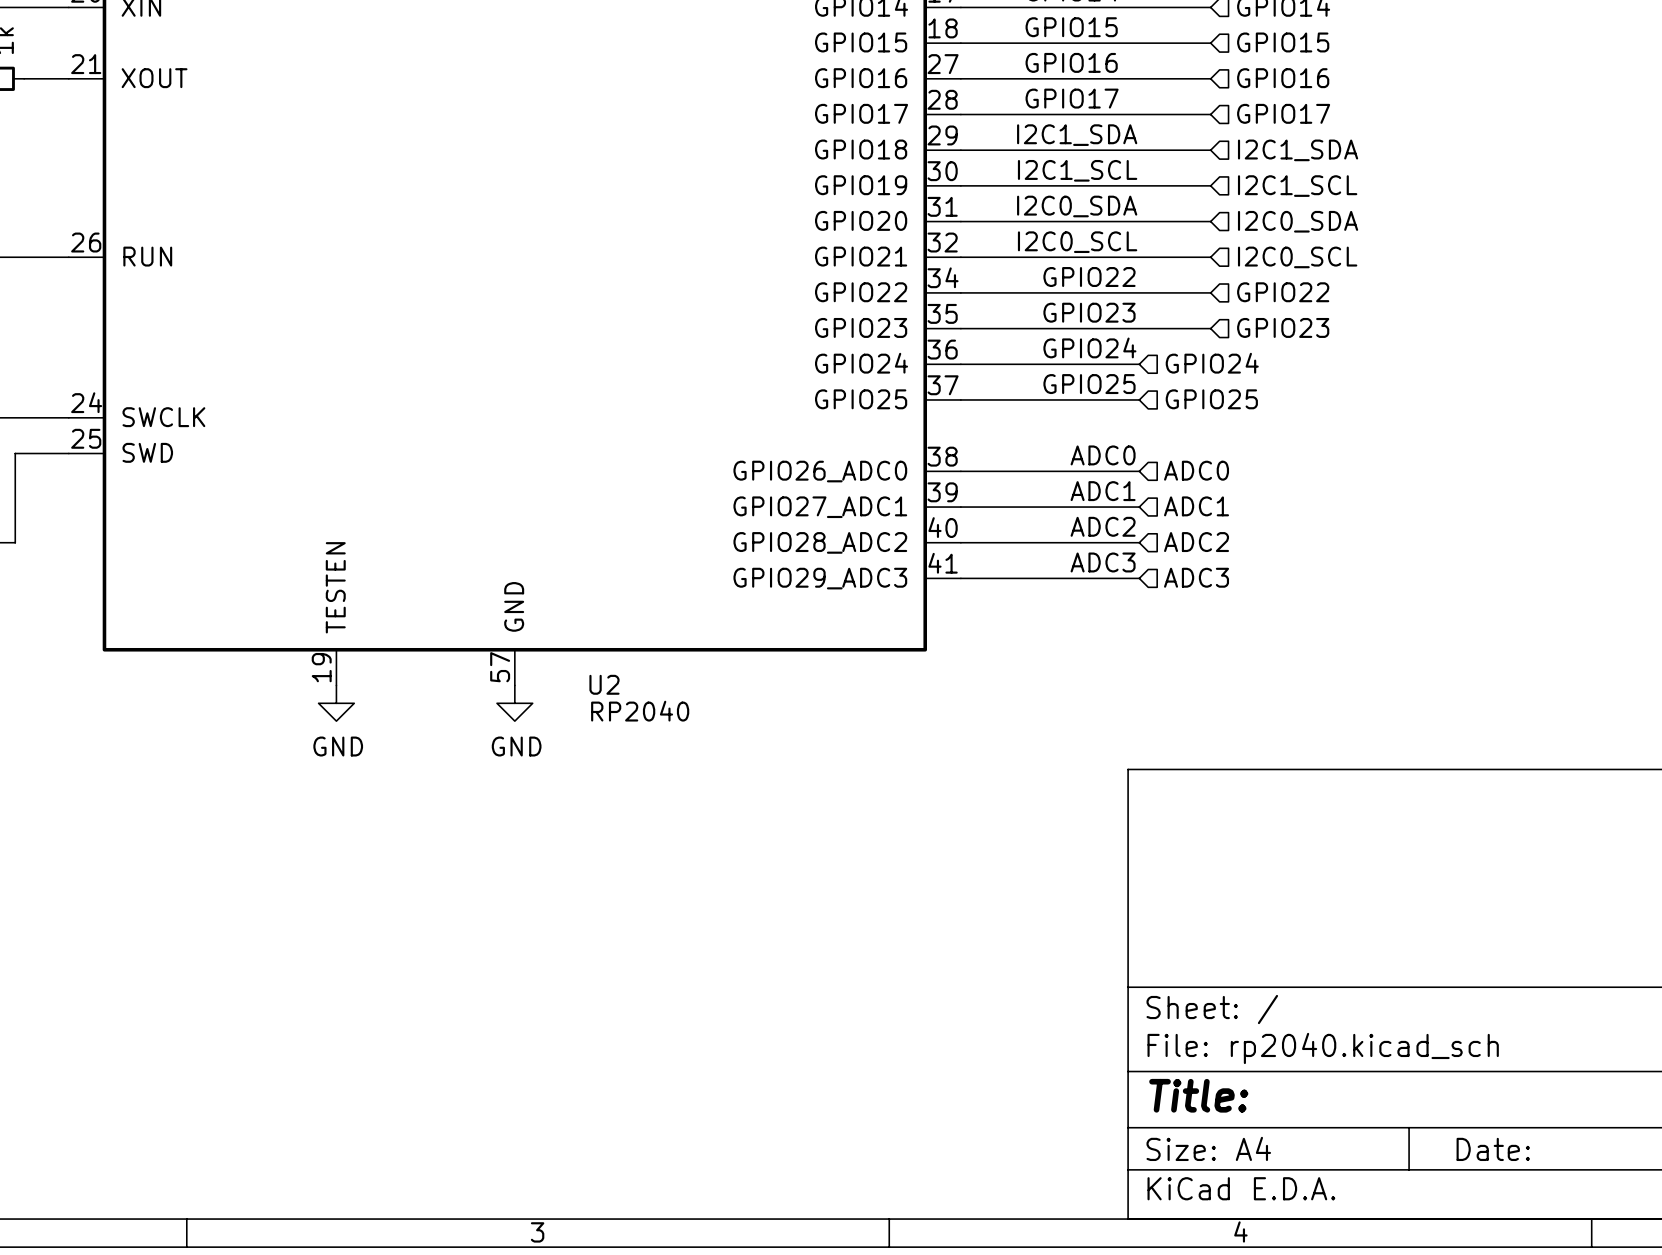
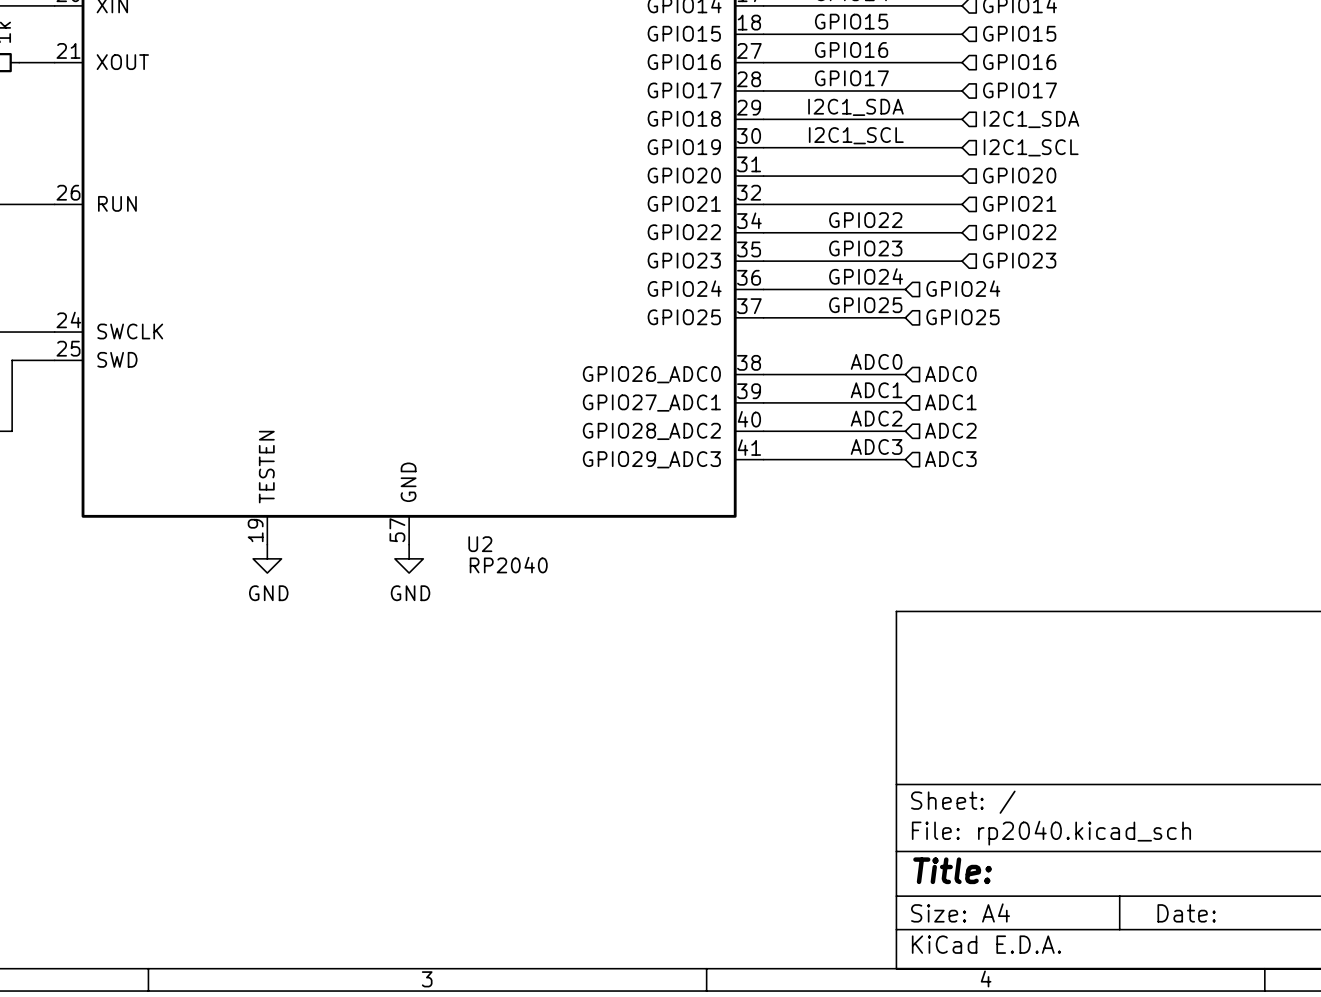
label: I2C0_SDA (1077, 206) -> none
hierarchical label: I2C0_SDA (1298, 221) -> GPIO20 (1019, 175)
label: I2C0_SCL (1077, 242) -> none
hierarchical label: I2C0_SCL (1297, 257) -> GPIO21 (1019, 203)

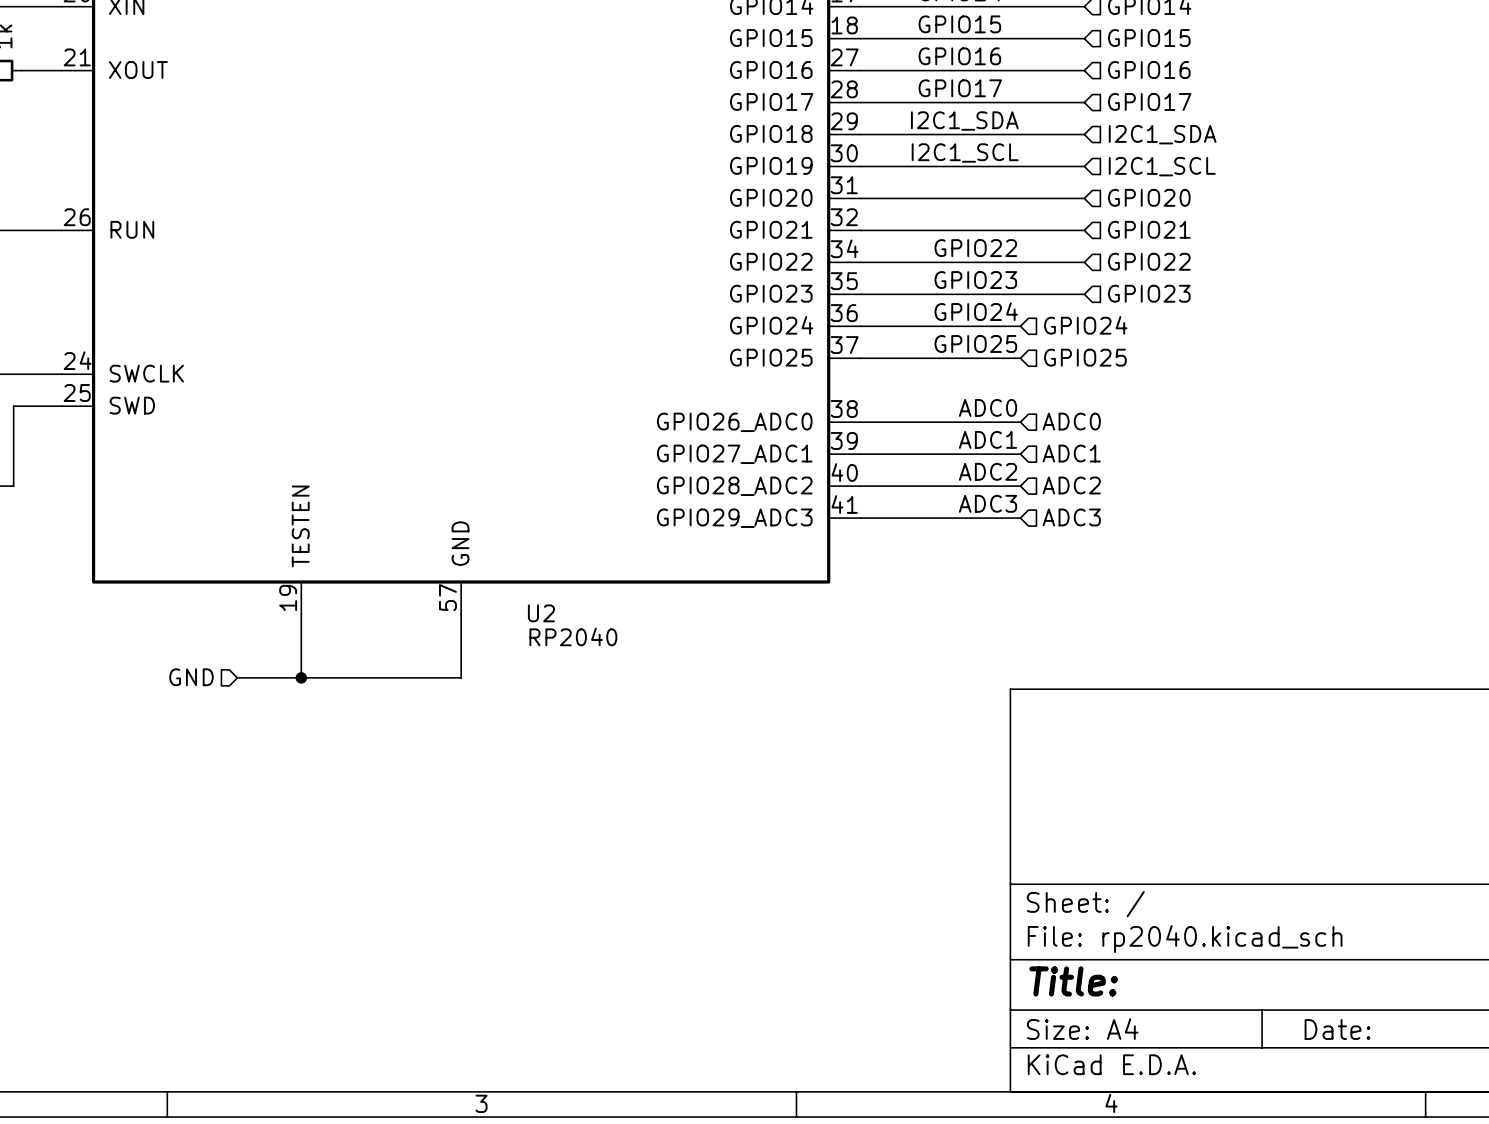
wire: none -> (301, 613) (301, 677)
wire: none -> (461, 613) (461, 677) (237, 677)
power symbol: GND (267, 558) -> none
power symbol: GND (409, 558) -> none
hierarchical label: none -> GND (191, 677)
junction: none -> (301, 677)

